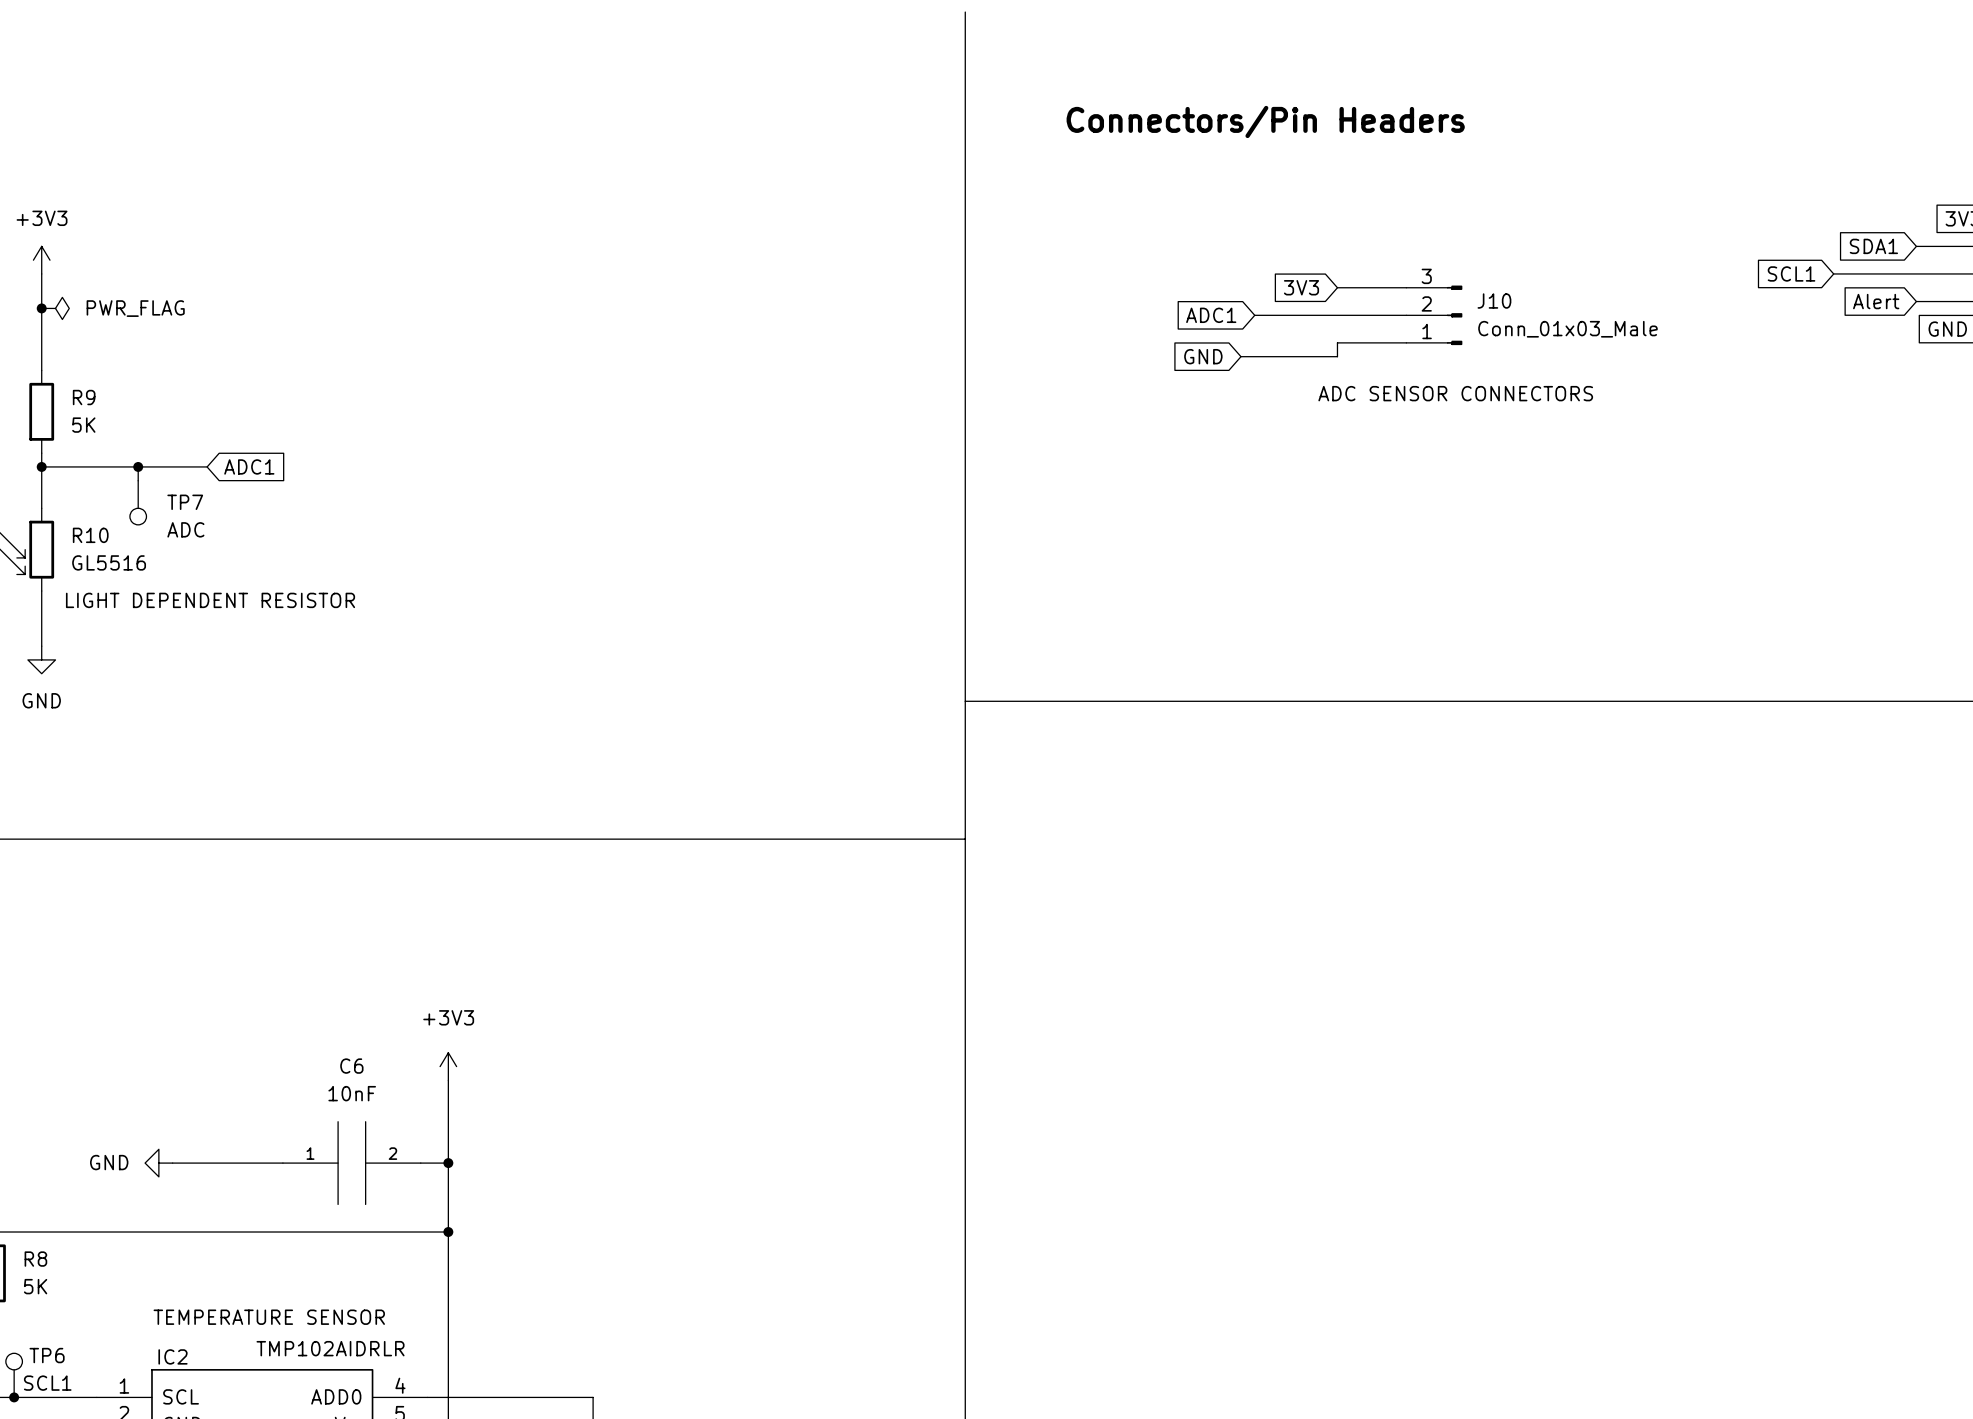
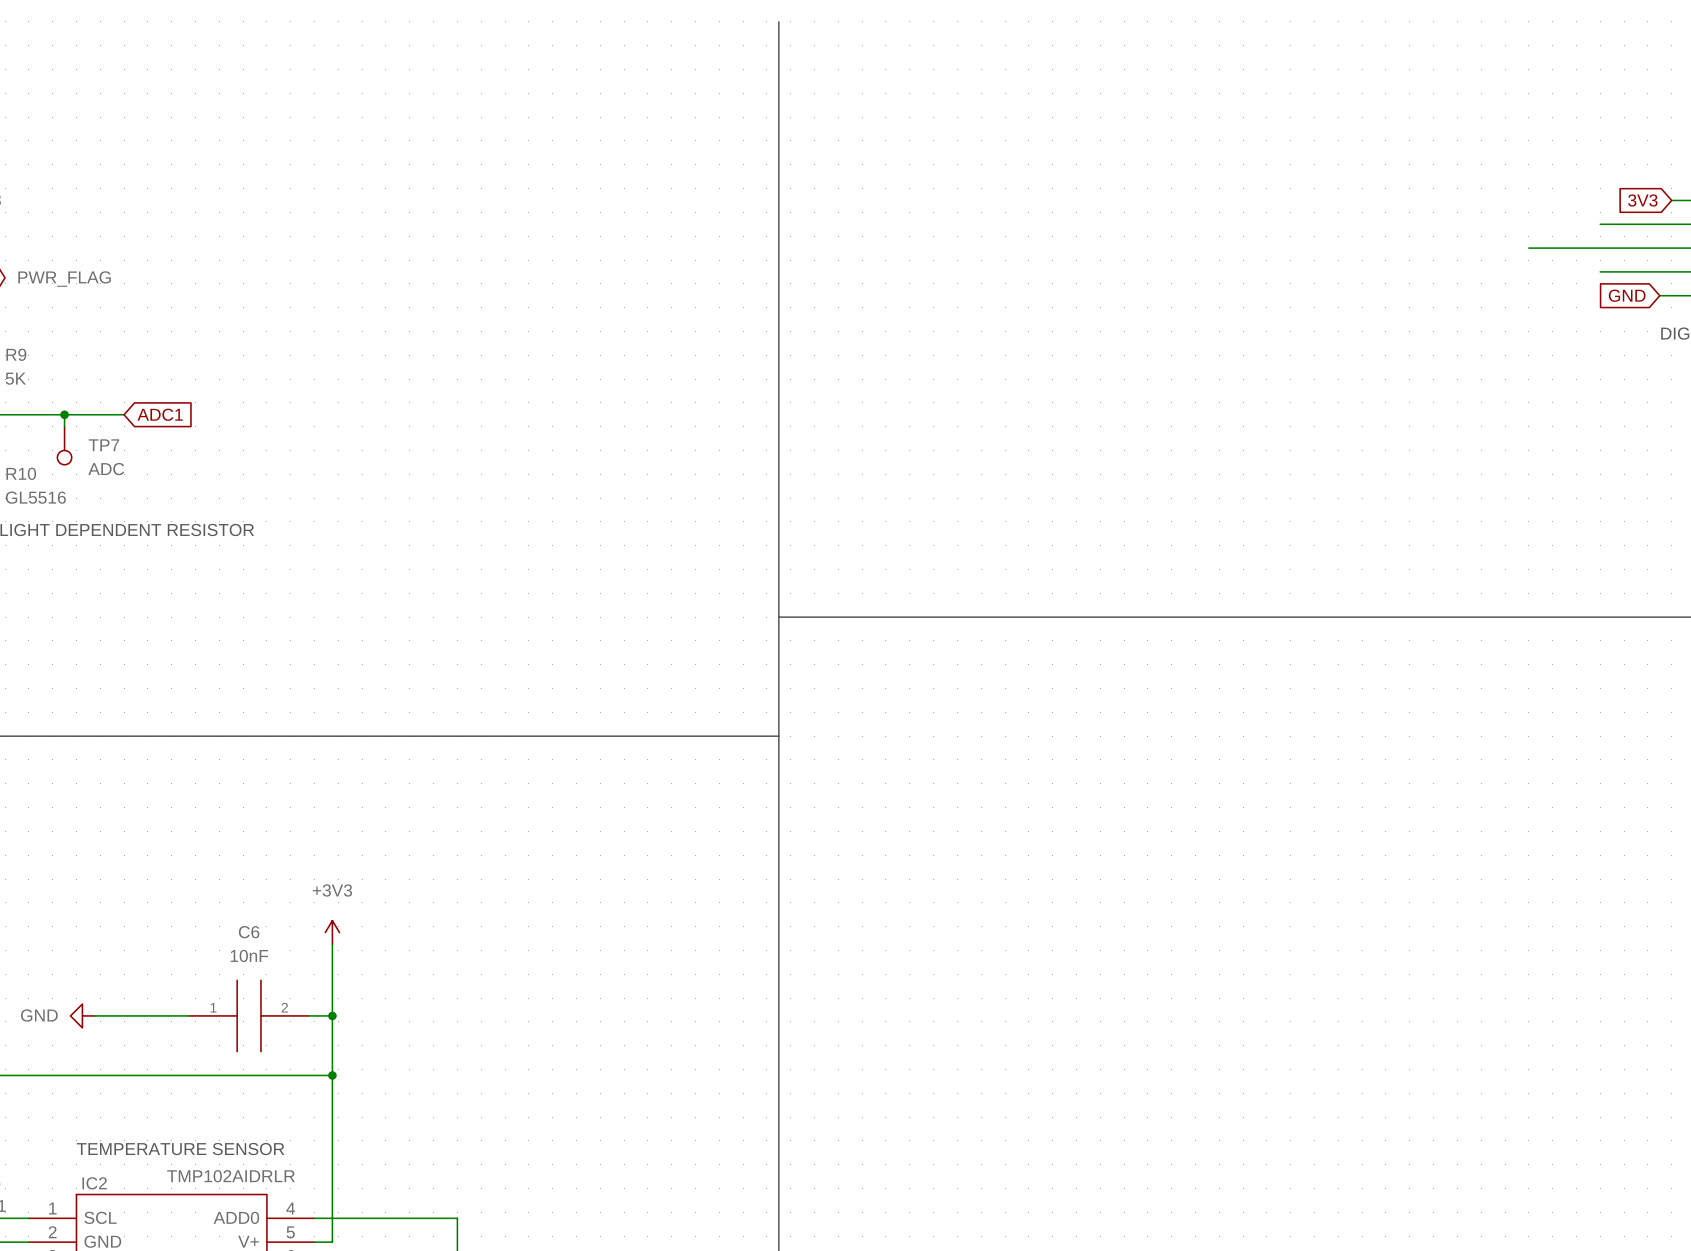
text: Connectors/Pin Headers (1265, 121) -> none
global label: SDA1 (1873, 246) -> none
global label: SCL1 (1791, 273) -> none
global label: 3V3 (1301, 287) -> none
wire: (1337, 287) (1406, 287) -> none
global label: Alert (1876, 301) -> none
global label: ADC1 (1211, 315) -> none
wire: (1254, 315) (1406, 315) -> none
J10: Conn_01x03_Male (1434, 315) -> none
wire: (1406, 342) (1337, 342) (1337, 356) (1240, 356) -> none
global label: GND (1203, 356) -> none
text: ADC SENSOR CONNECTORS (1455, 393) -> none

